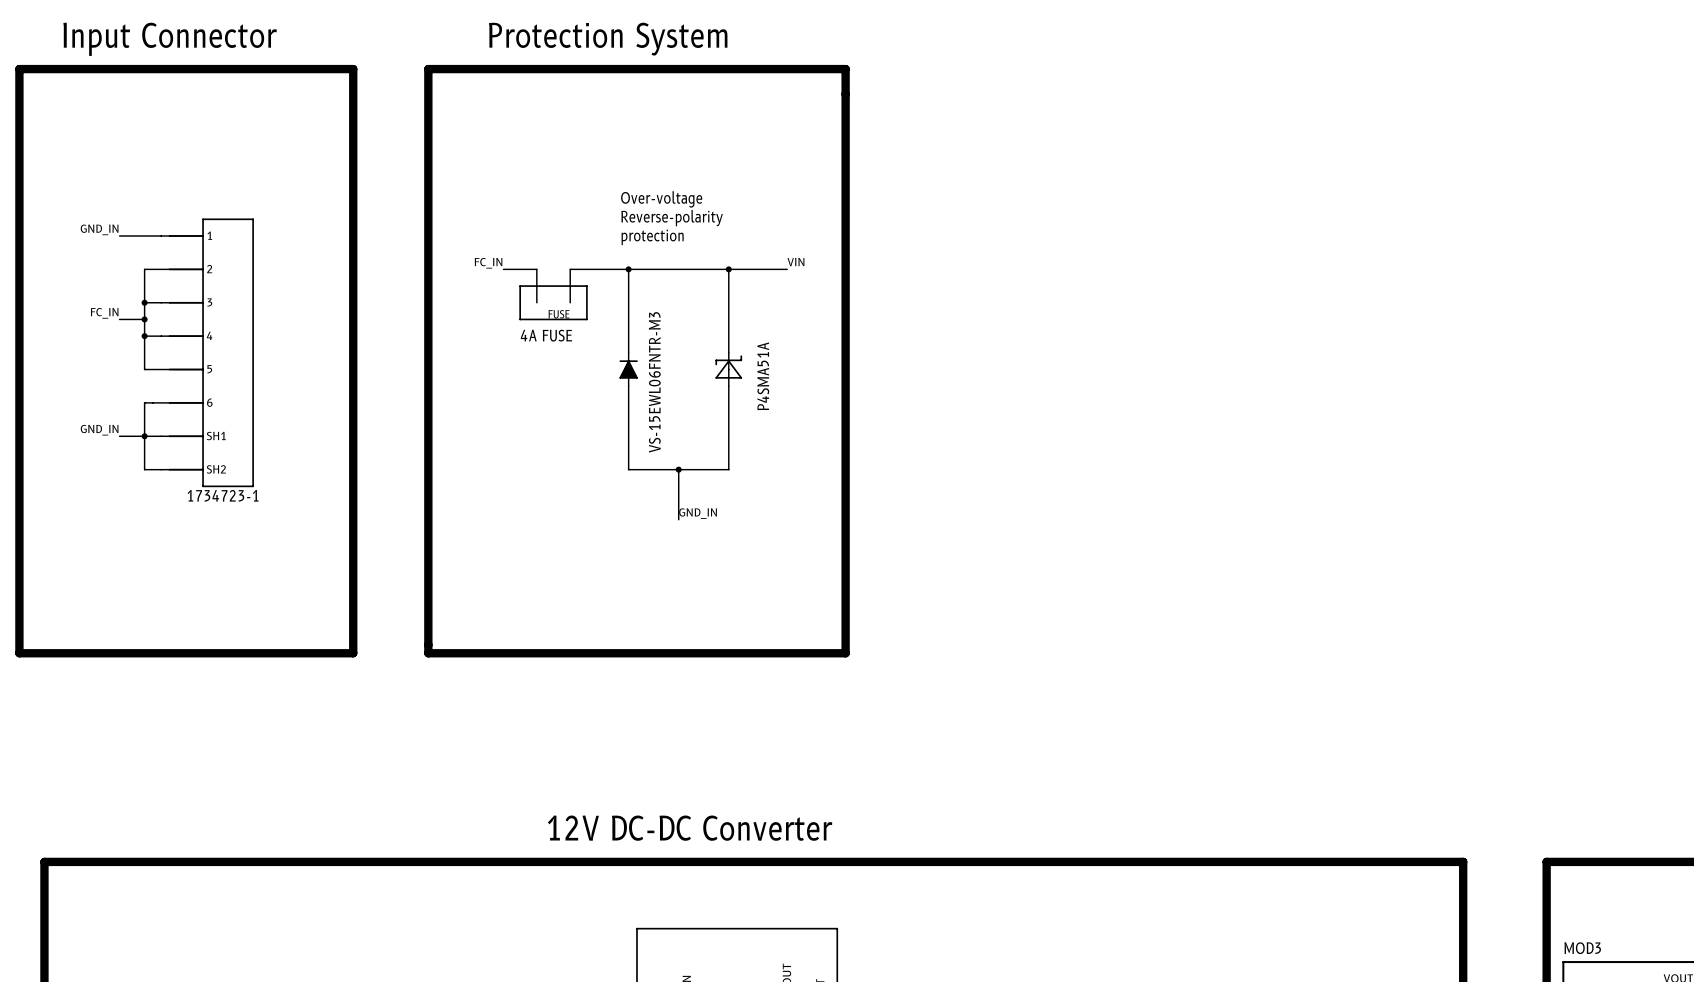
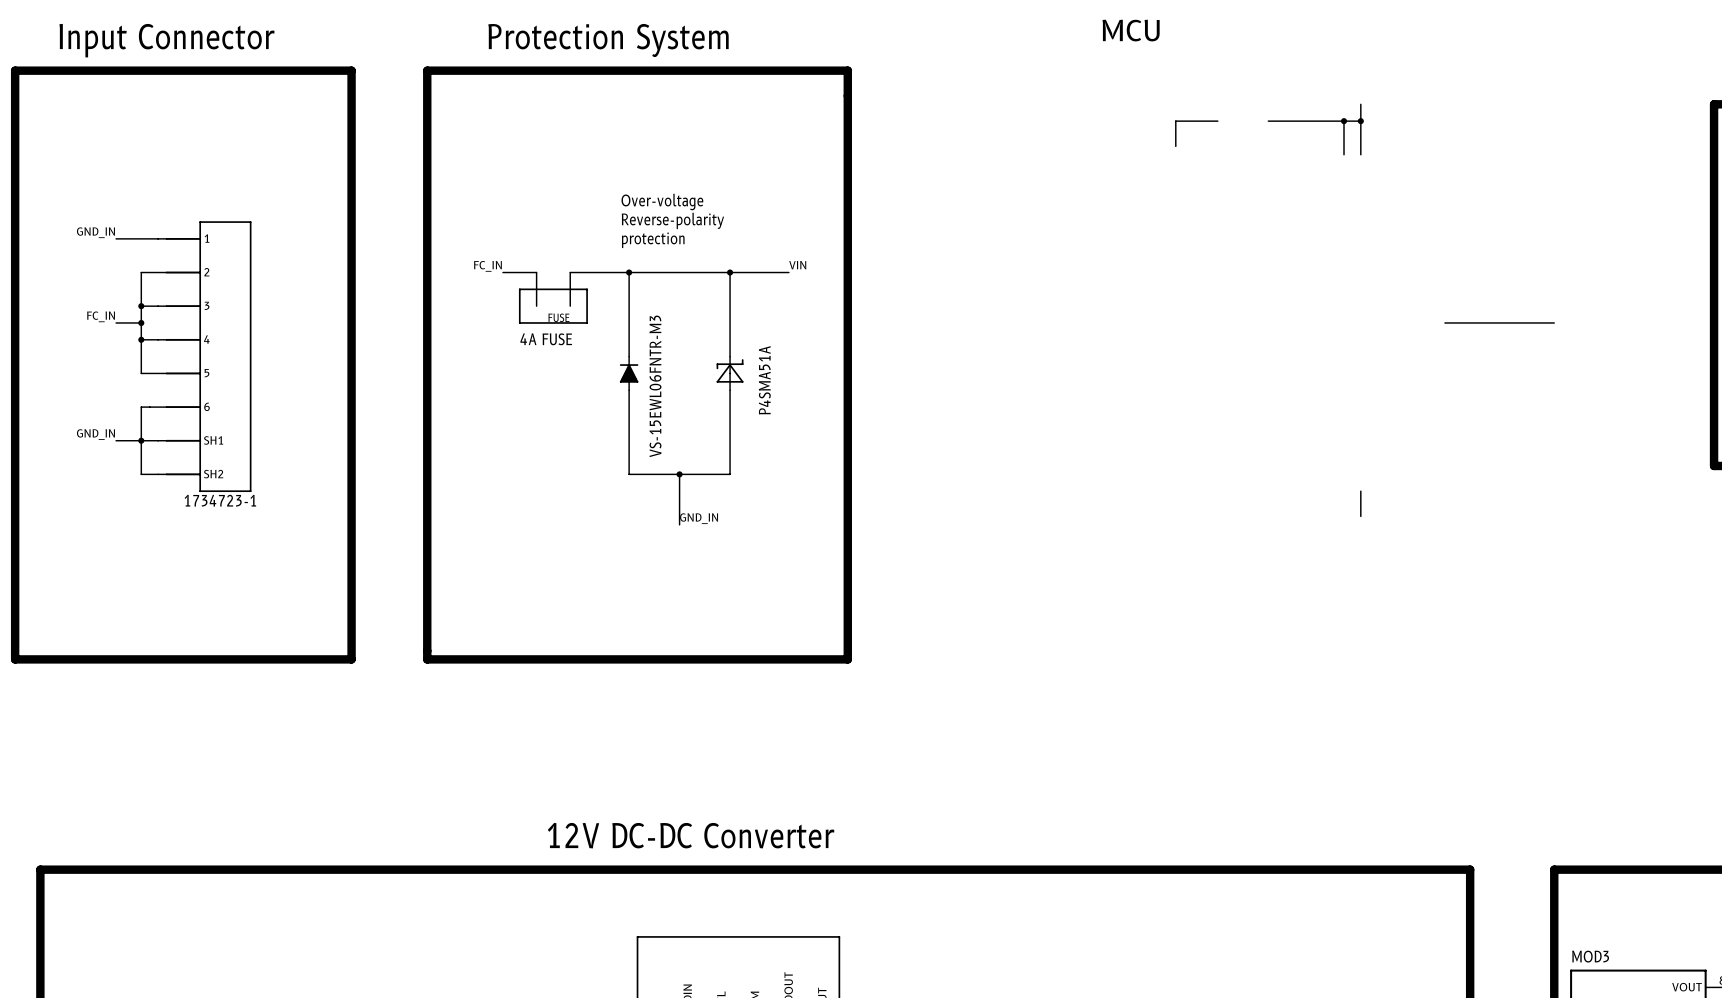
text: none -> MCU (1131, 30)
wire: none -> (1360, 104) (1360, 154)
wire: none -> (1217, 121) (1175, 121) (1175, 146)
wire: none -> (1268, 121) (1360, 121)
wire: none -> (1344, 121) (1344, 154)
junction: none -> (1344, 121)
junction: none -> (1360, 121)
wire: none -> (1444, 322) (1554, 322)
wire: none -> (1360, 491) (1360, 516)

